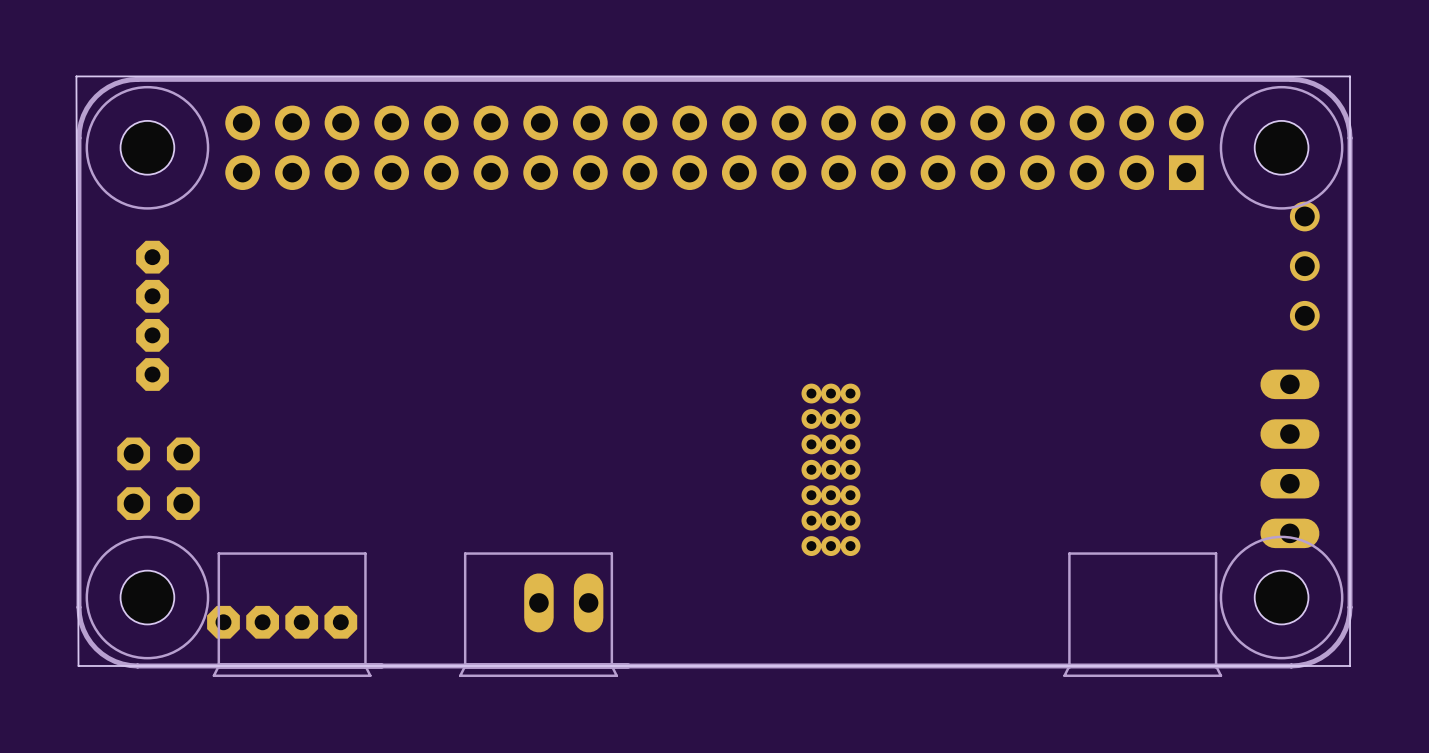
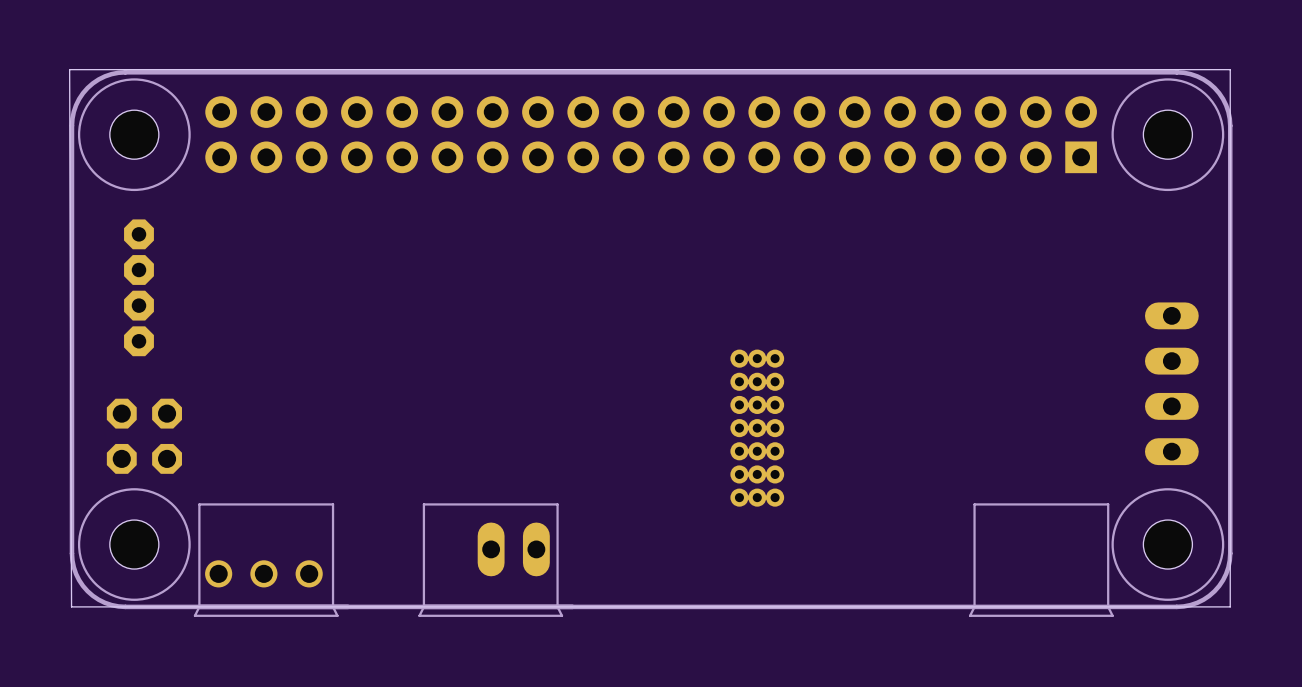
part: (1304, 266) -> none
part position: (1289, 458) -> (1171, 383)
part footprint: [207, 605, 358, 639] -> [205, 560, 323, 588]

